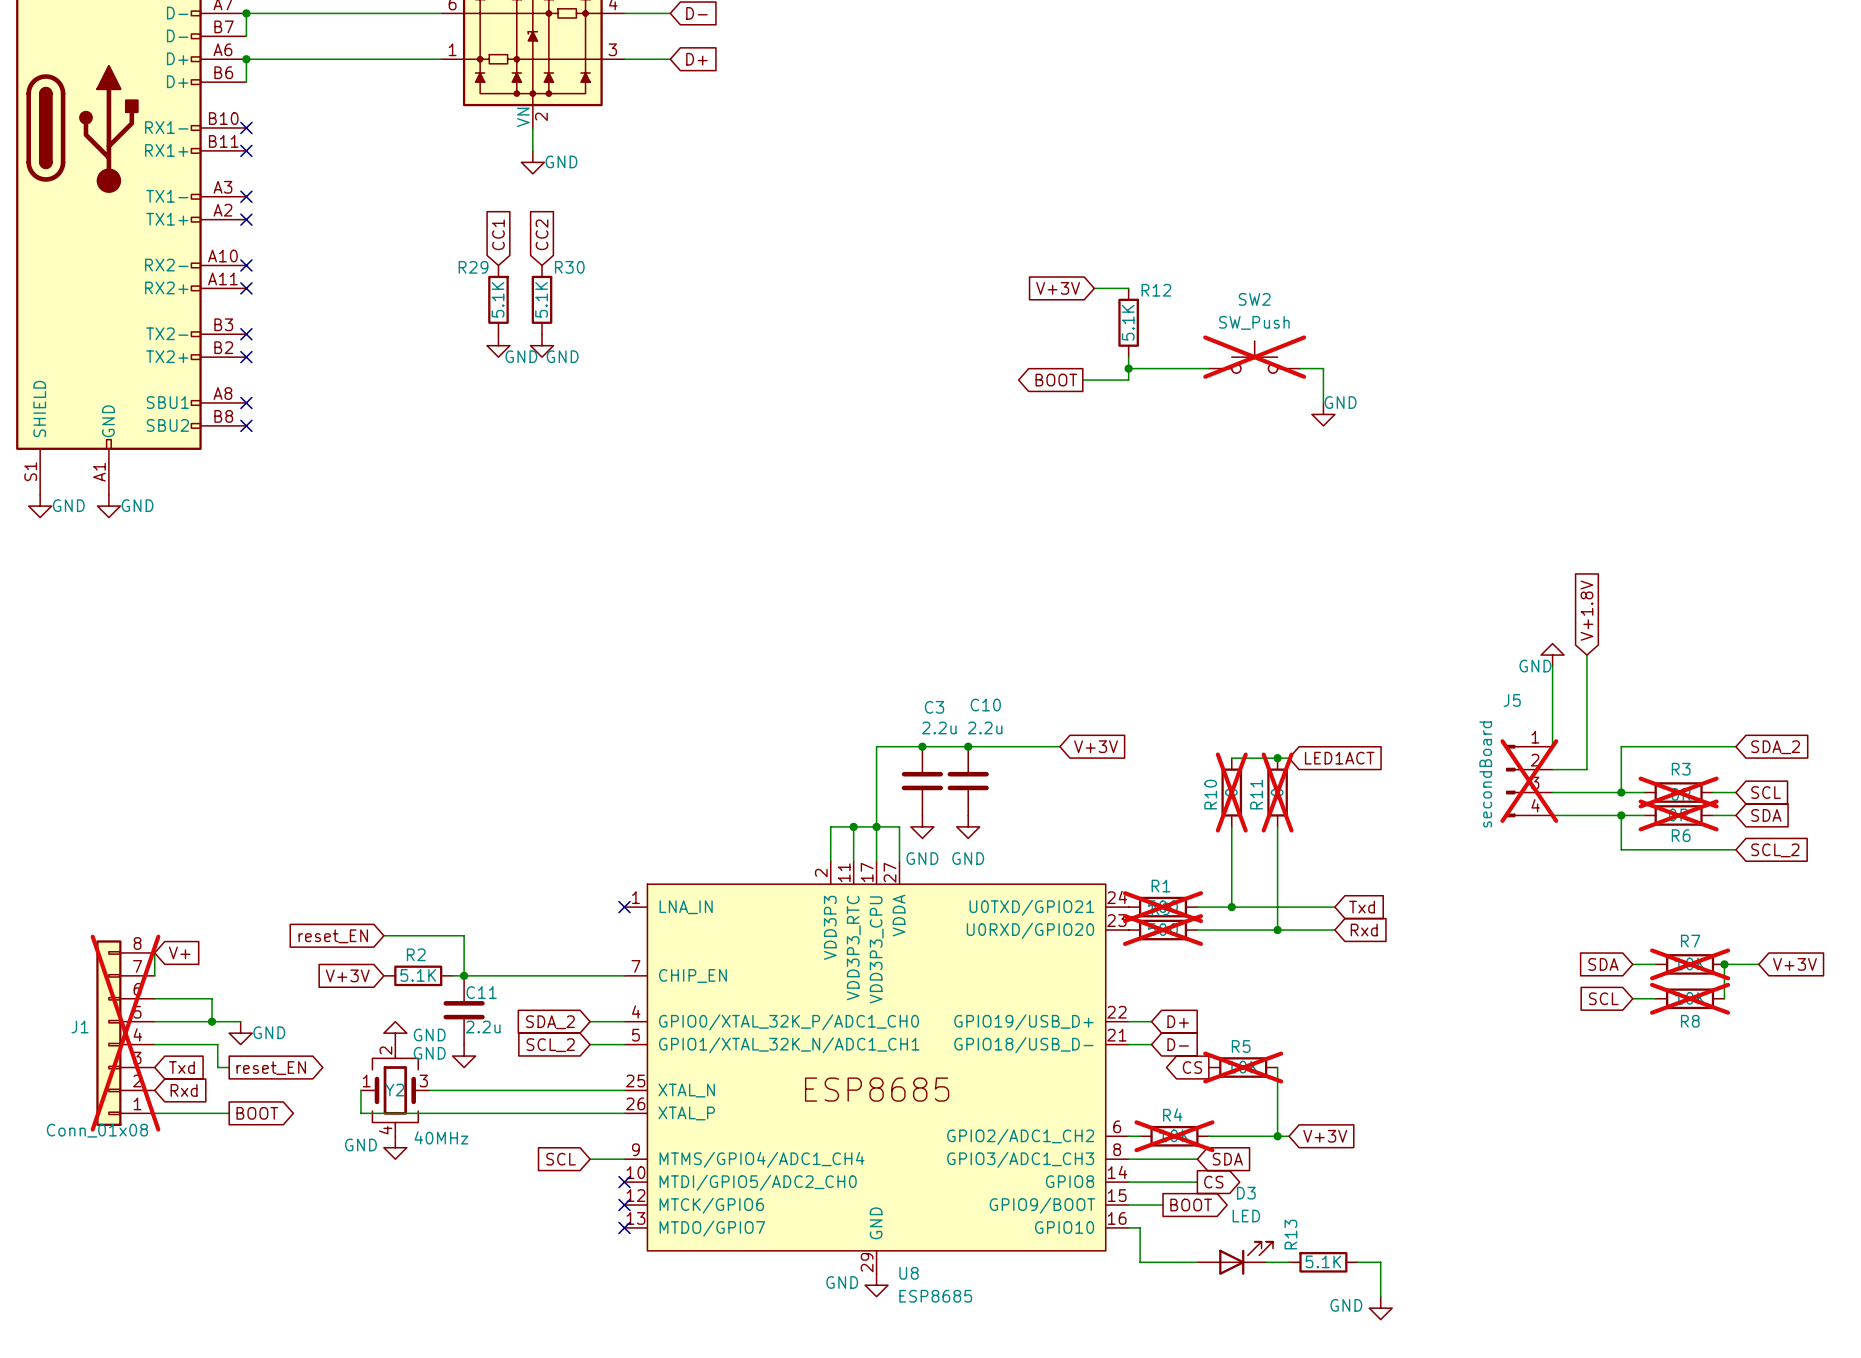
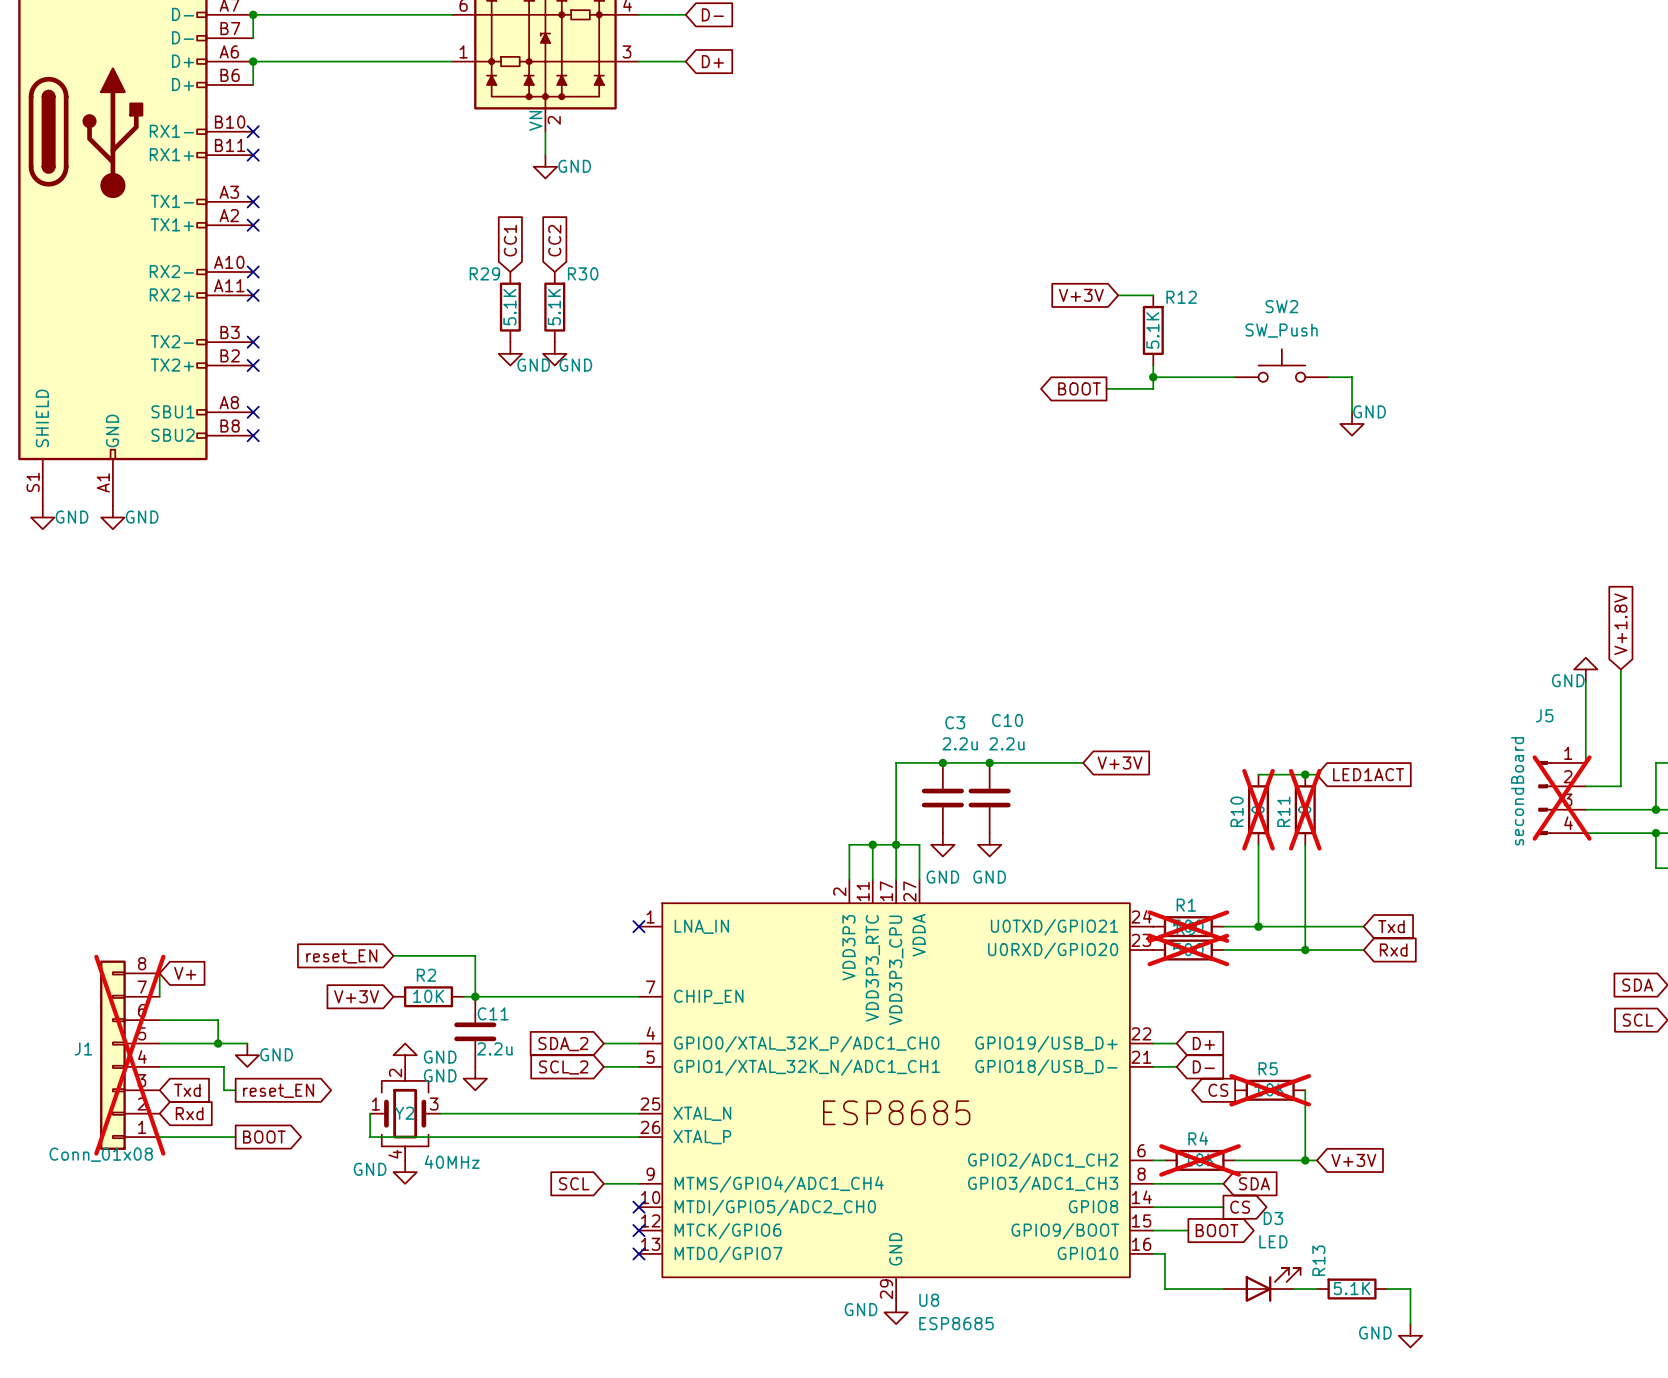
SW2 do-not-place cross: (1254, 357) -> none
R2 value: 5.1K (418, 975) -> 10K (428, 996)

